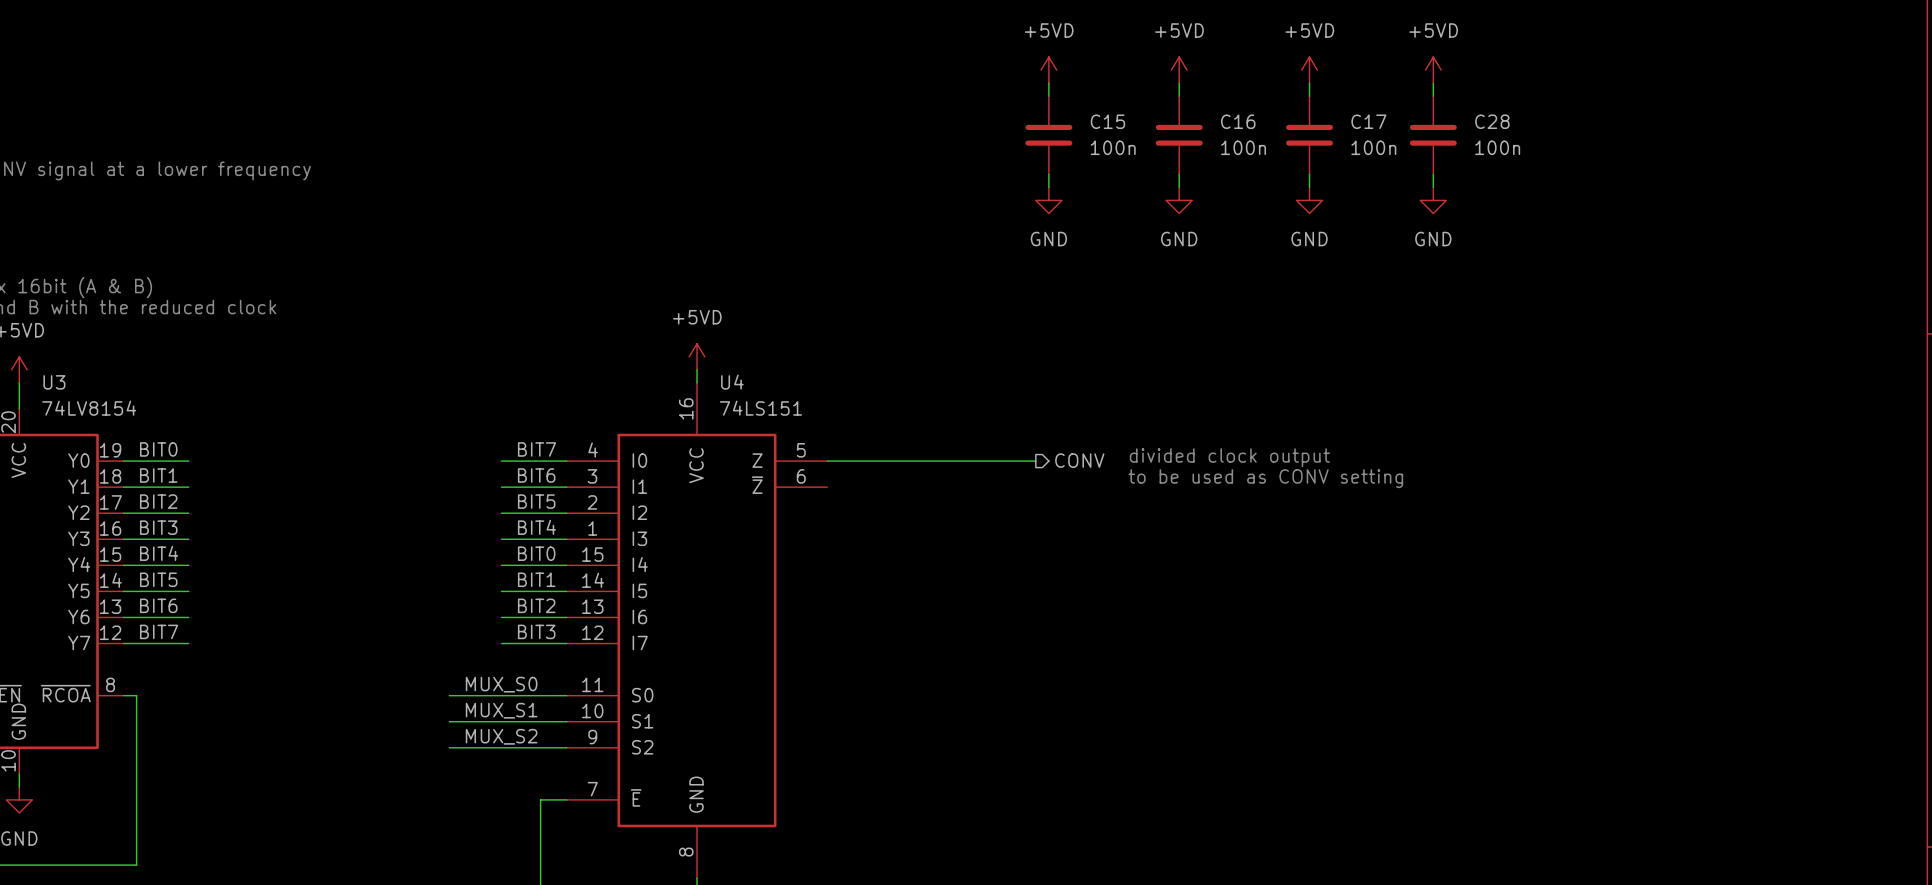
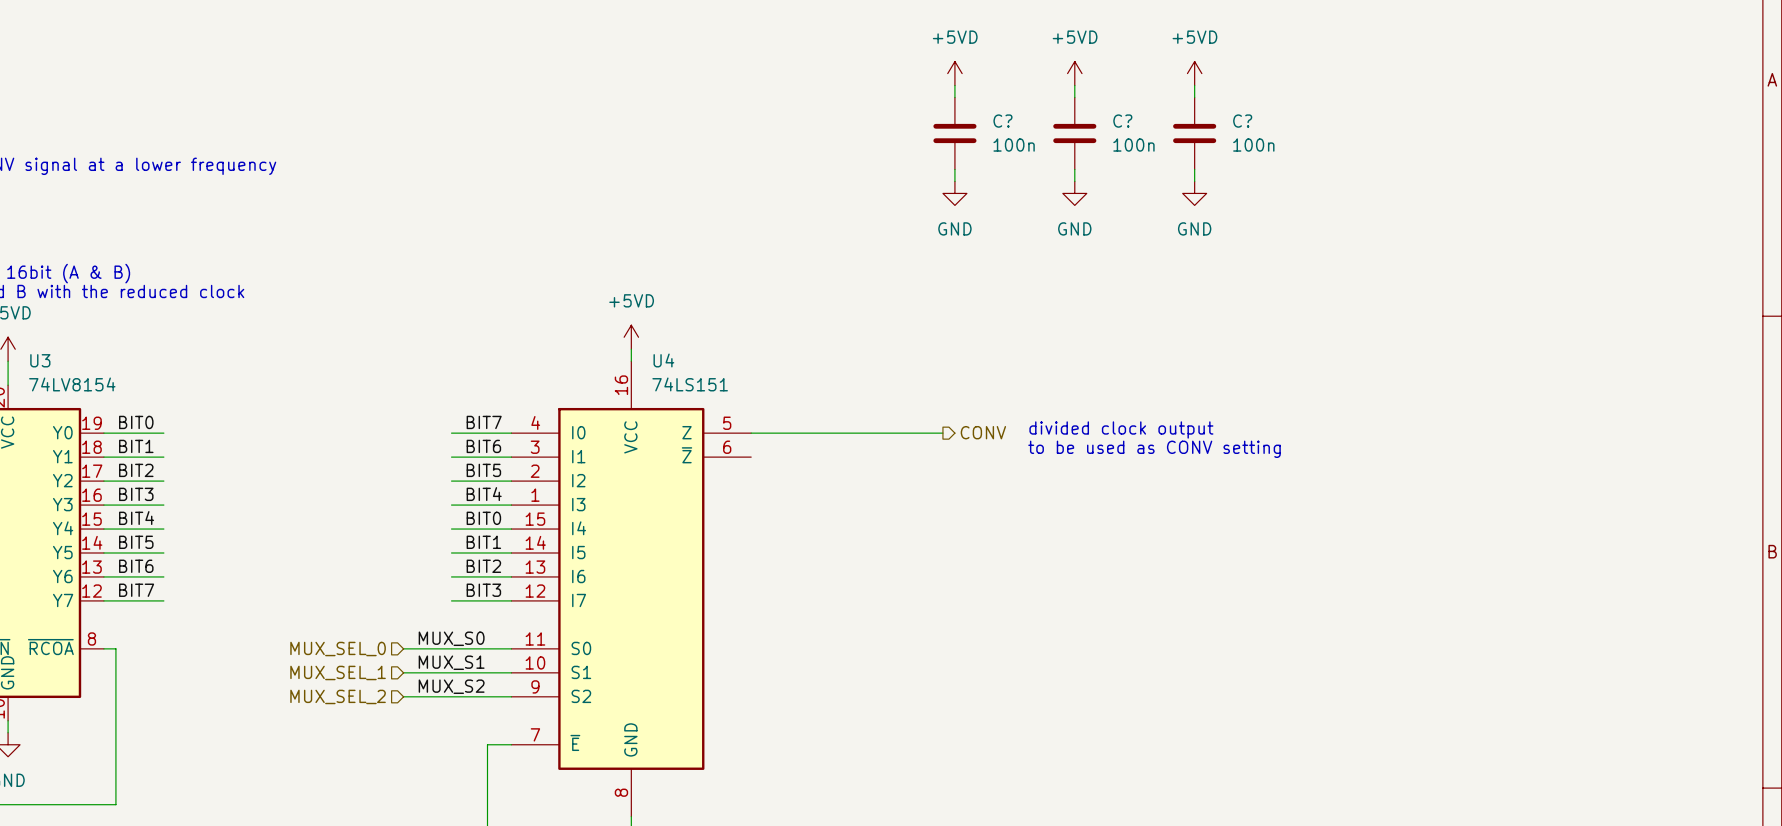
power symbol: +5VD (1433, 70) -> none
wire: (1433, 83) (1433, 96) -> none
C15 name: C15 (1107, 121) -> C? (1002, 121)
C16 name: C16 (1238, 121) -> C? (1122, 121)
C17 name: C17 (1368, 121) -> C? (1242, 121)
C28: 100n (1433, 135) -> none
wire: (1433, 174) (1433, 187) -> none
power symbol: GND (1433, 200) -> none
hierarchical label: none -> MUX_SEL_0 (338, 649)
hierarchical label: none -> MUX_SEL_1 (338, 672)
hierarchical label: none -> MUX_SEL_2 (338, 696)

